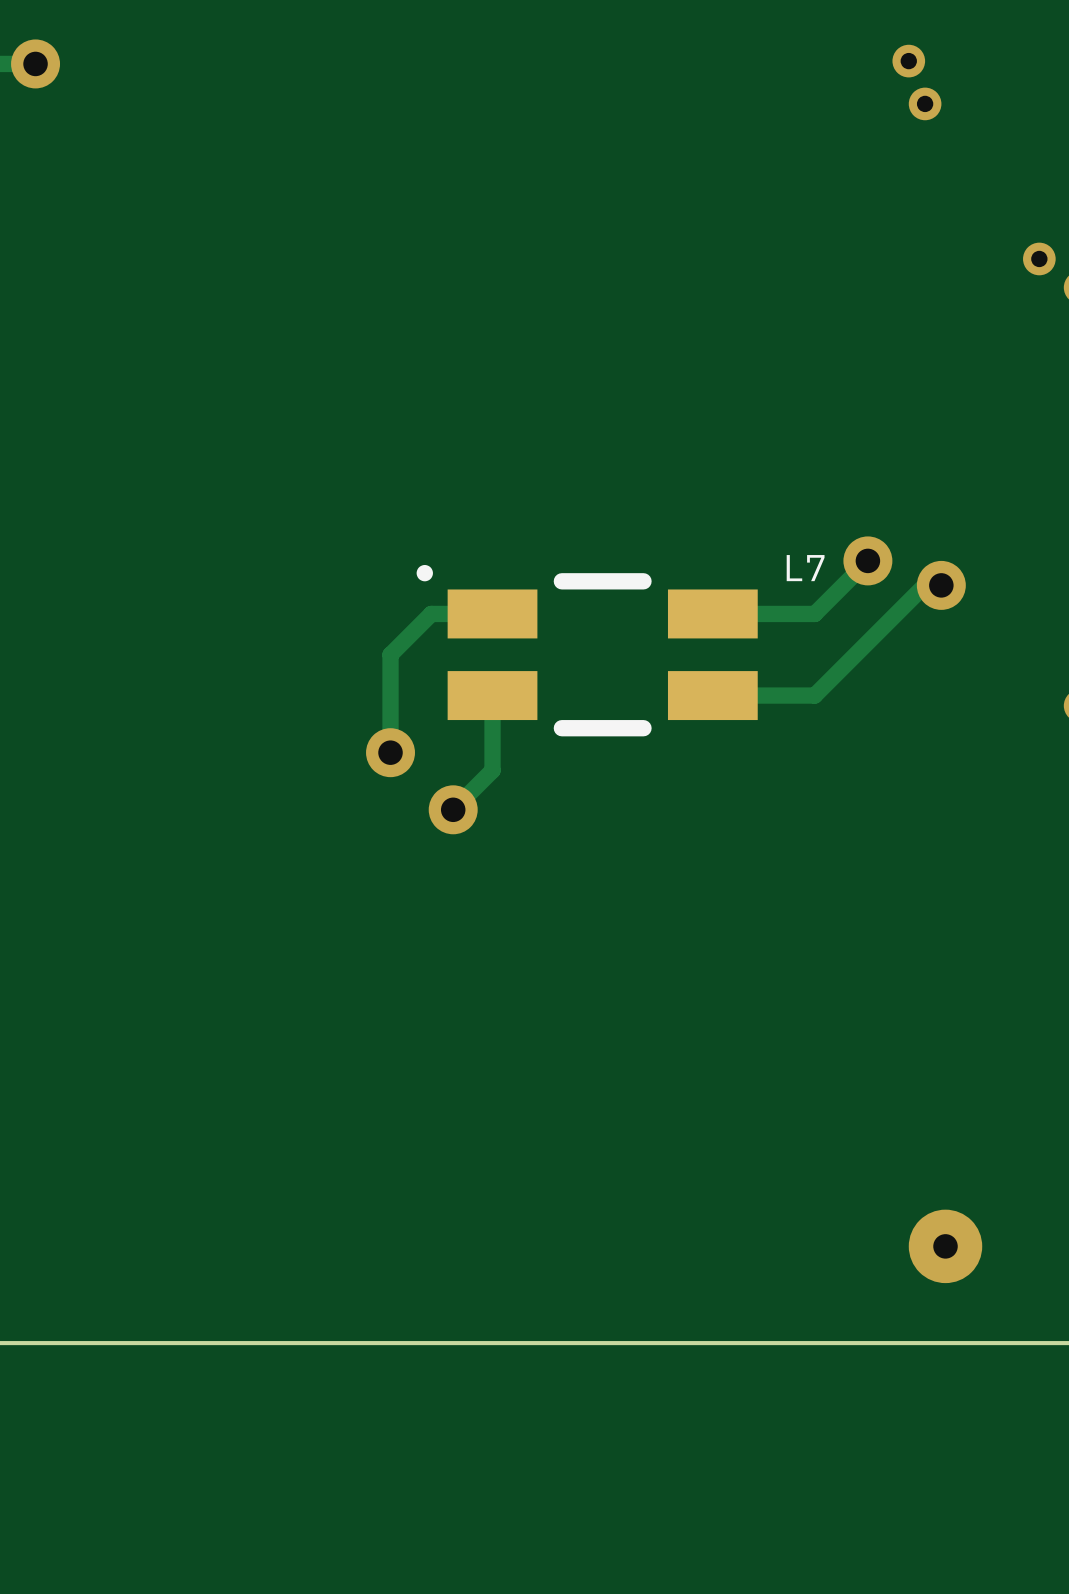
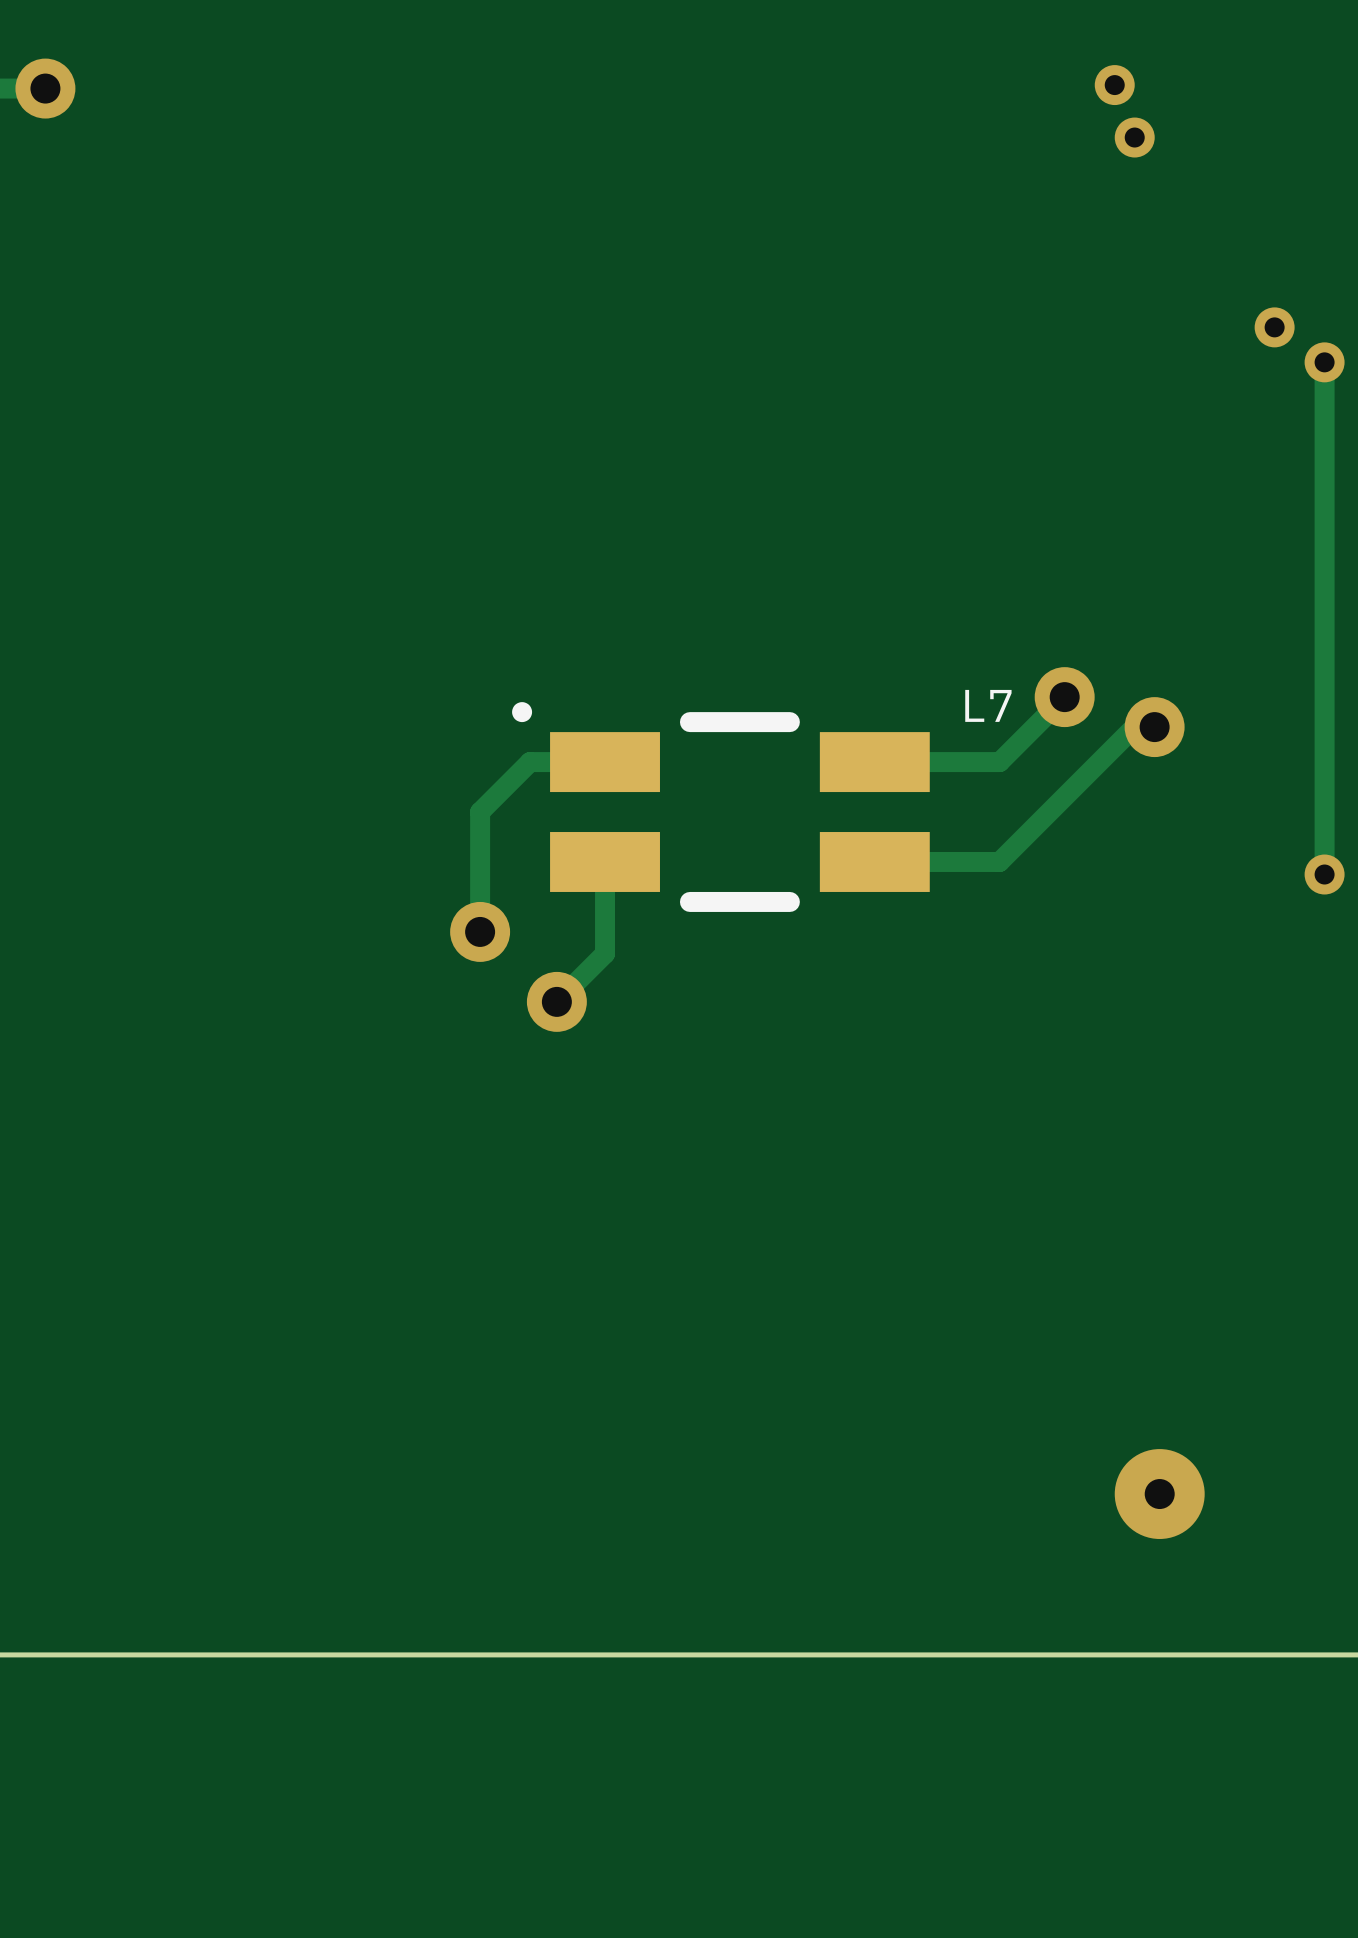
via position: (945, 1246) -> (1159, 1494)

